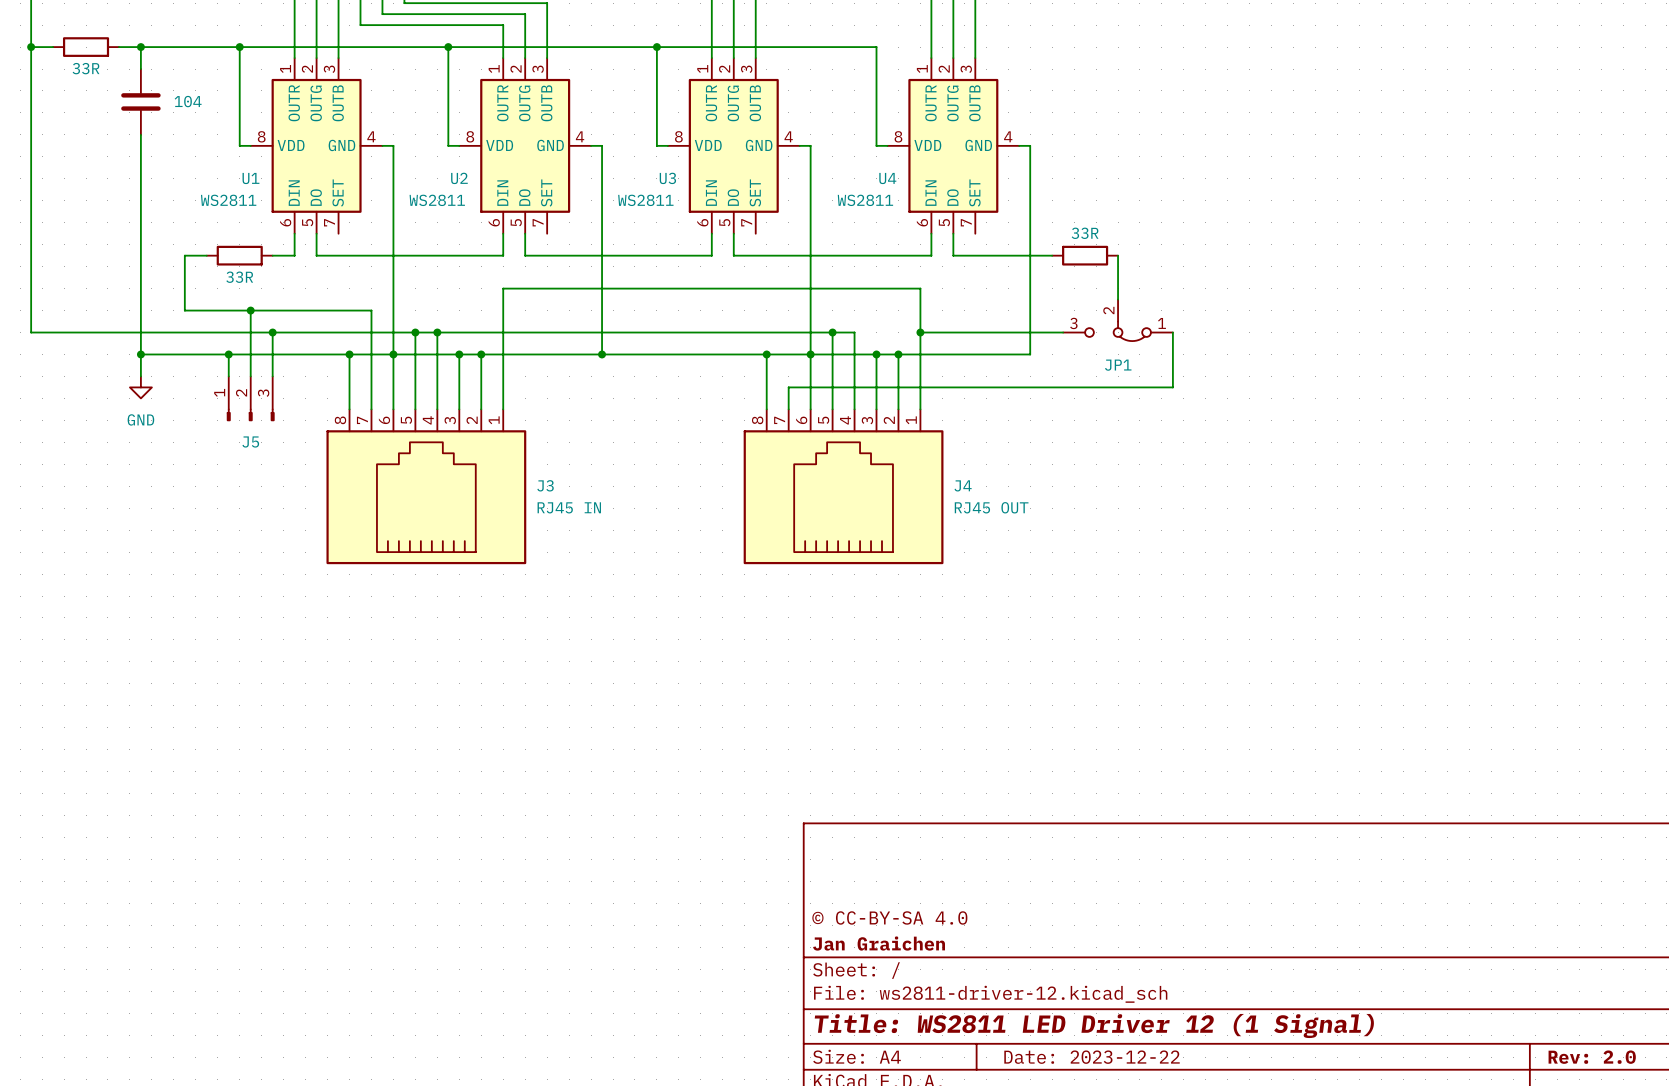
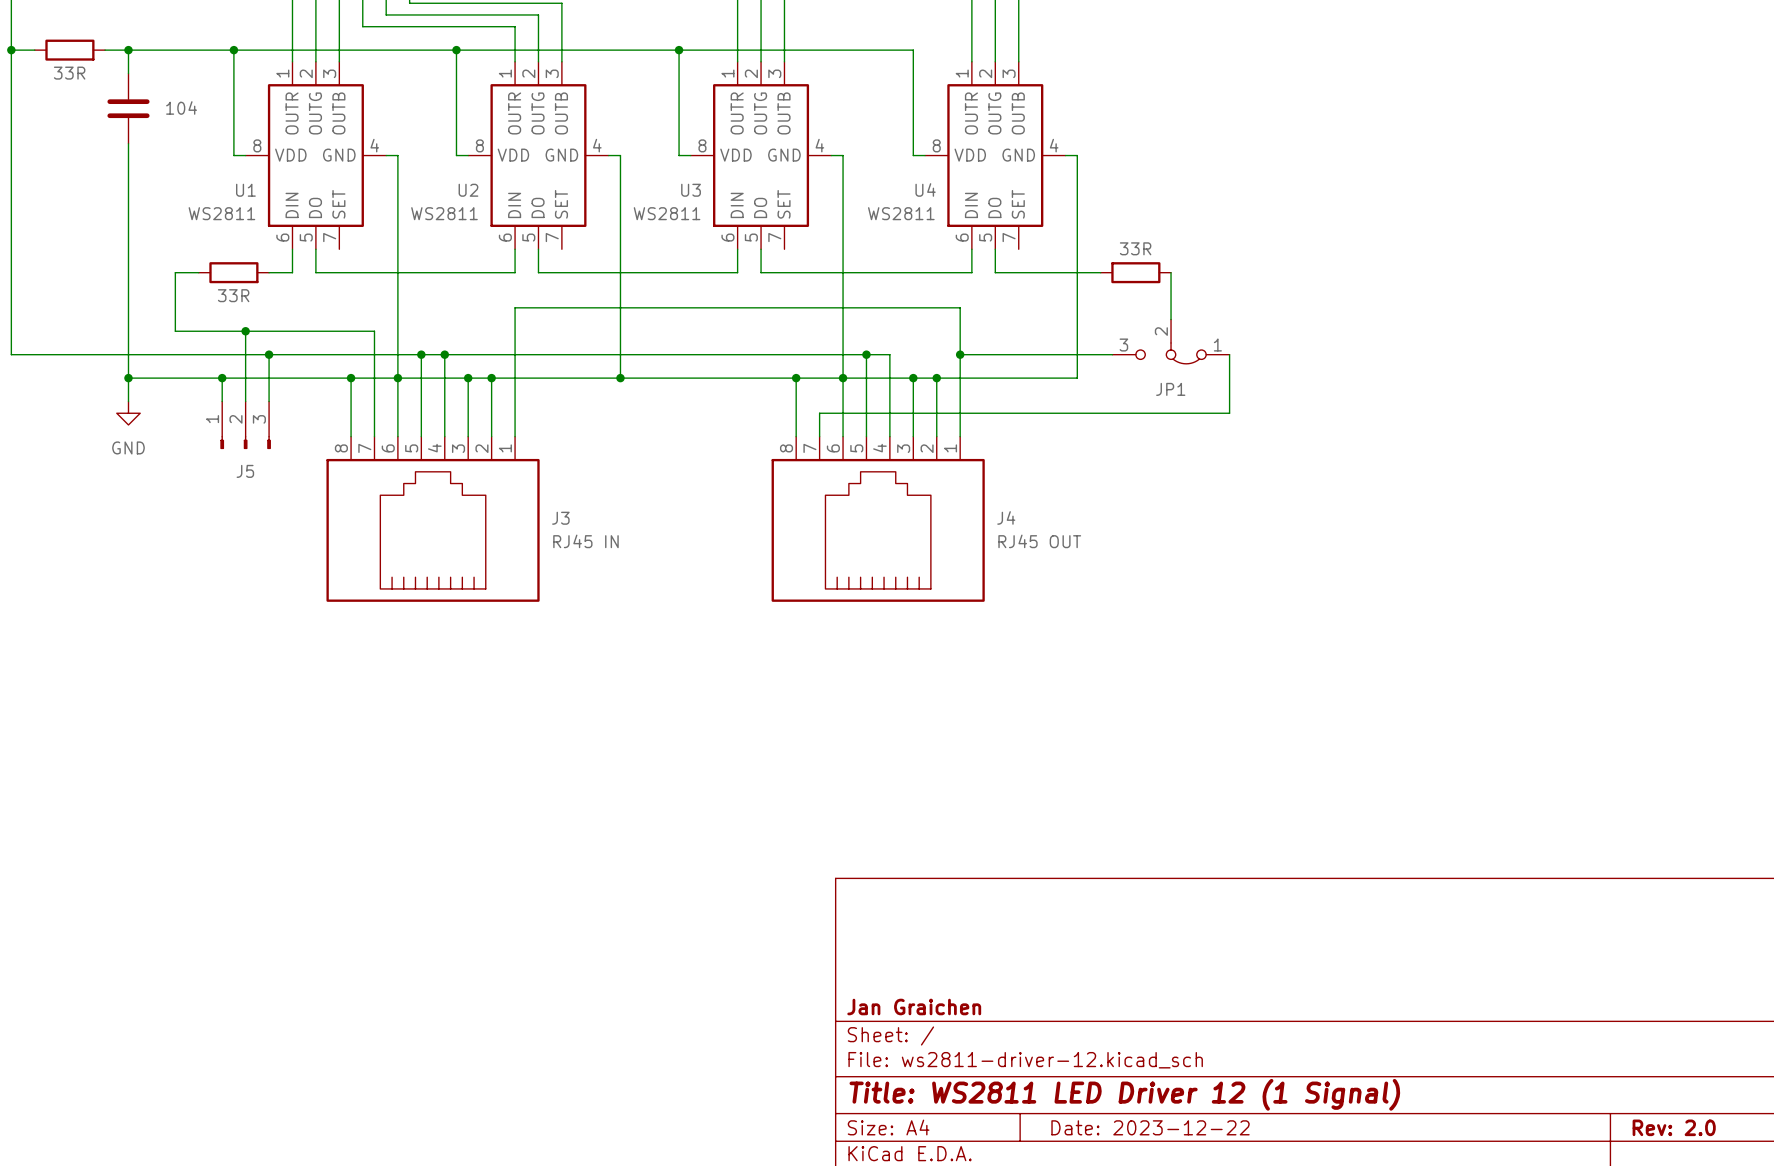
title block: © CC-BY-SA 4.0 (889, 917) -> none

